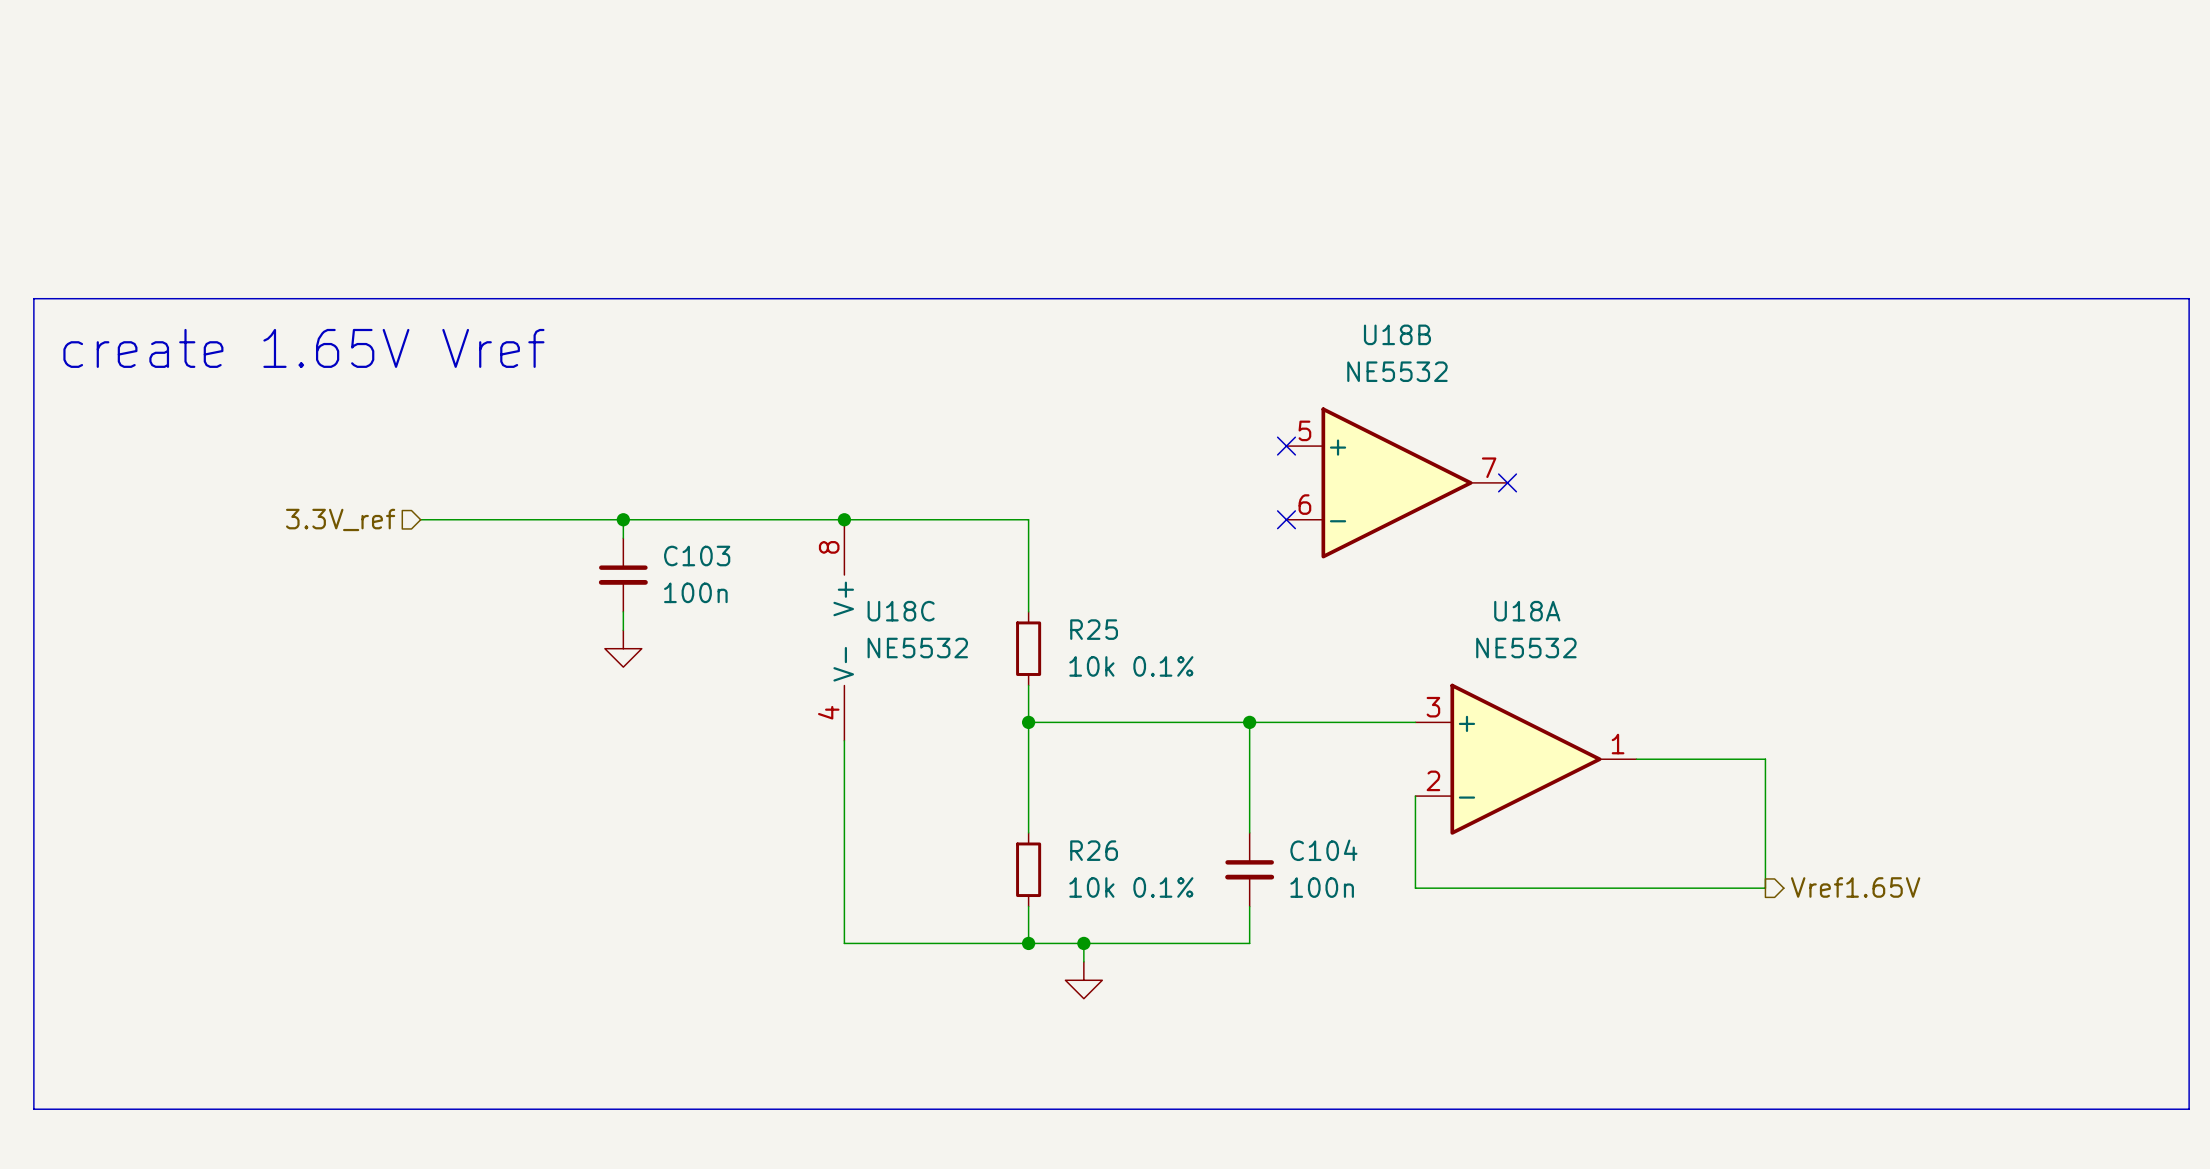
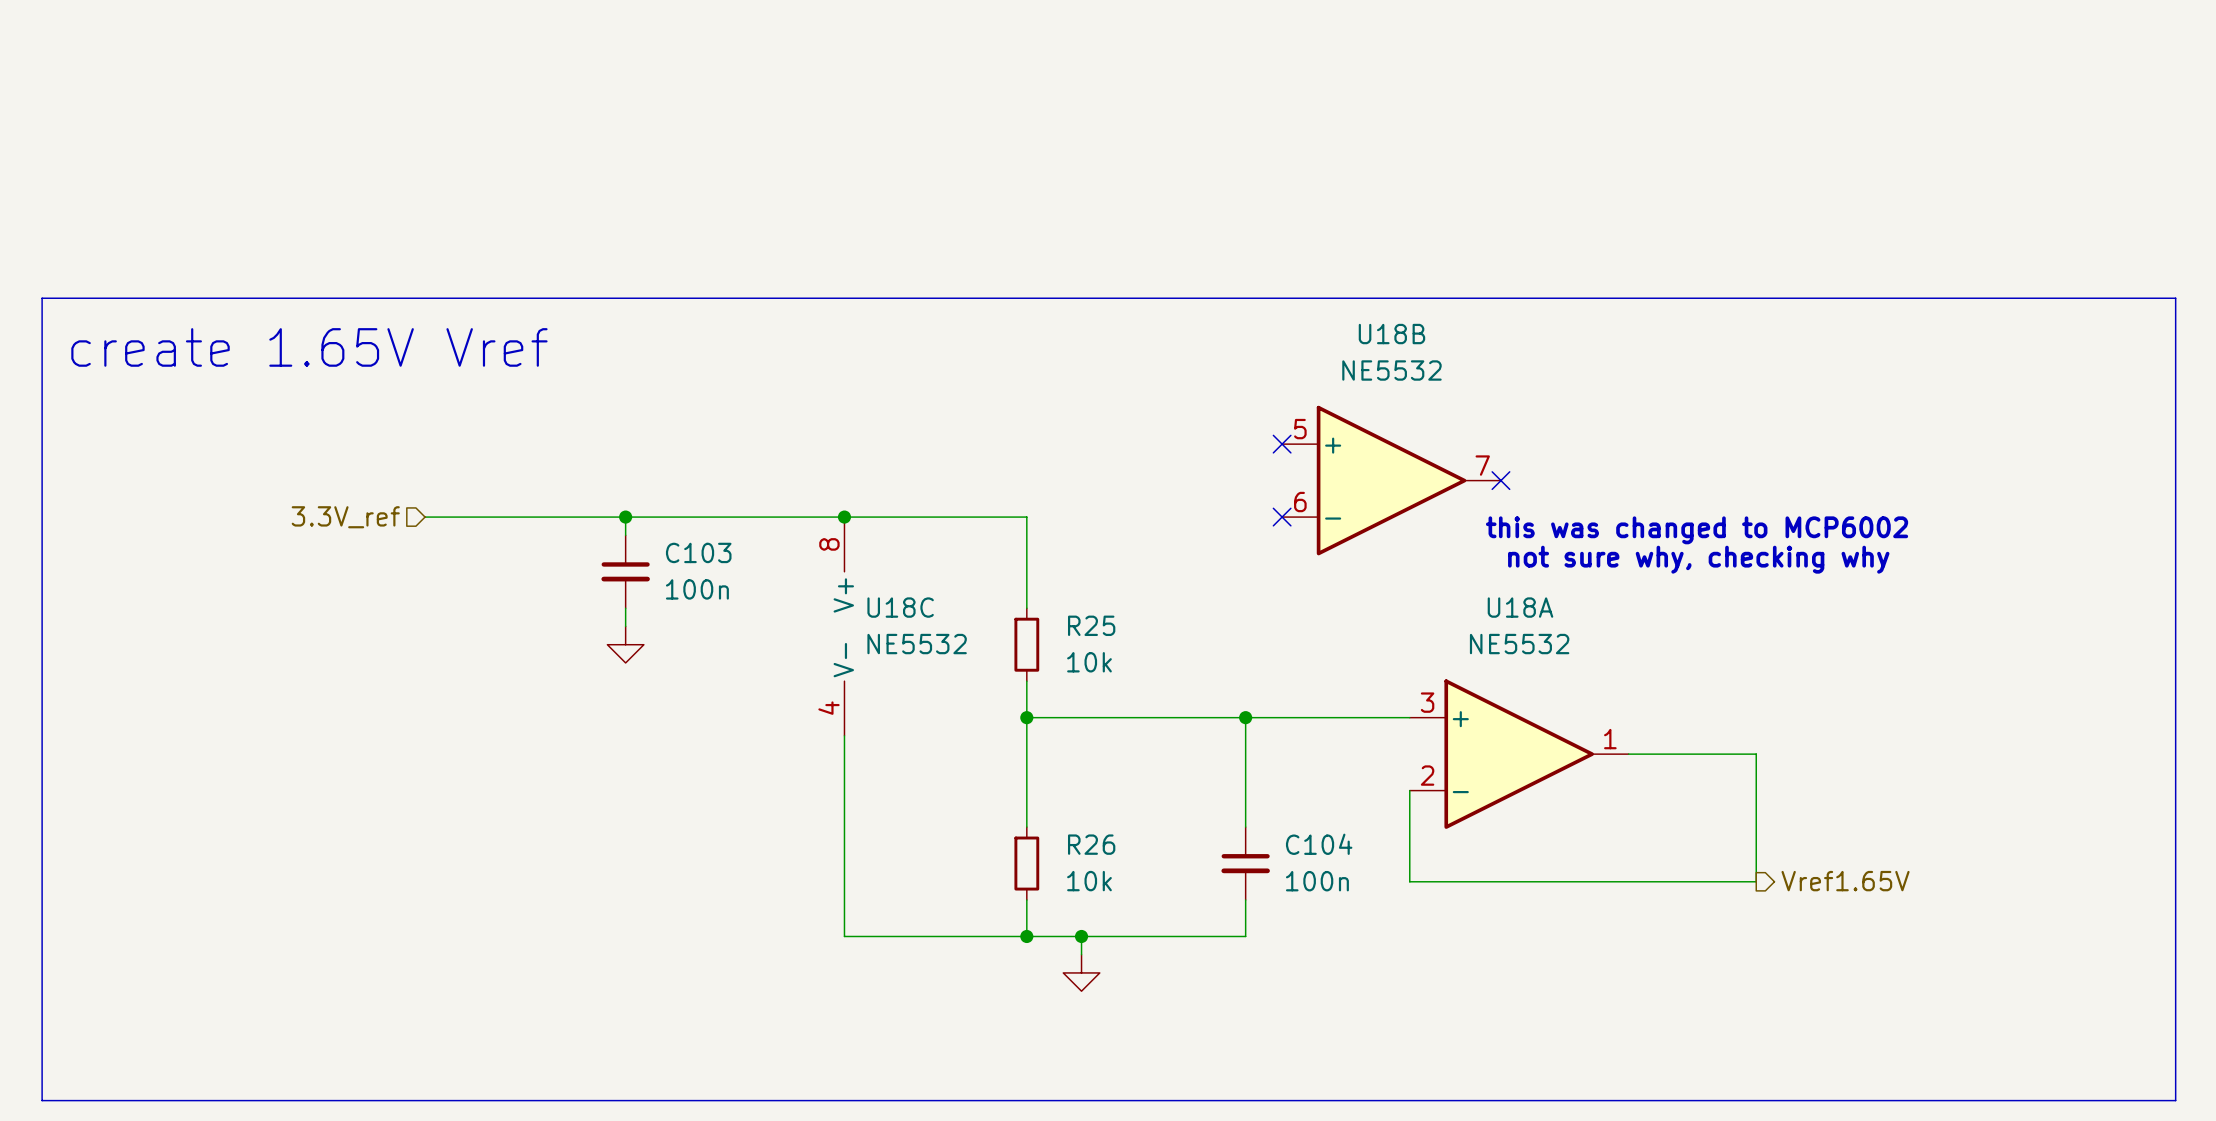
text: none -> this was changed to MCP6002 (1697, 530)
text: none -> not sure why, checking why (1698, 559)
R25 value: 10k 0.1% (1131, 666) -> 10k (1089, 662)
R26 value: 10k 0.1% (1131, 887) -> 10k (1089, 881)

